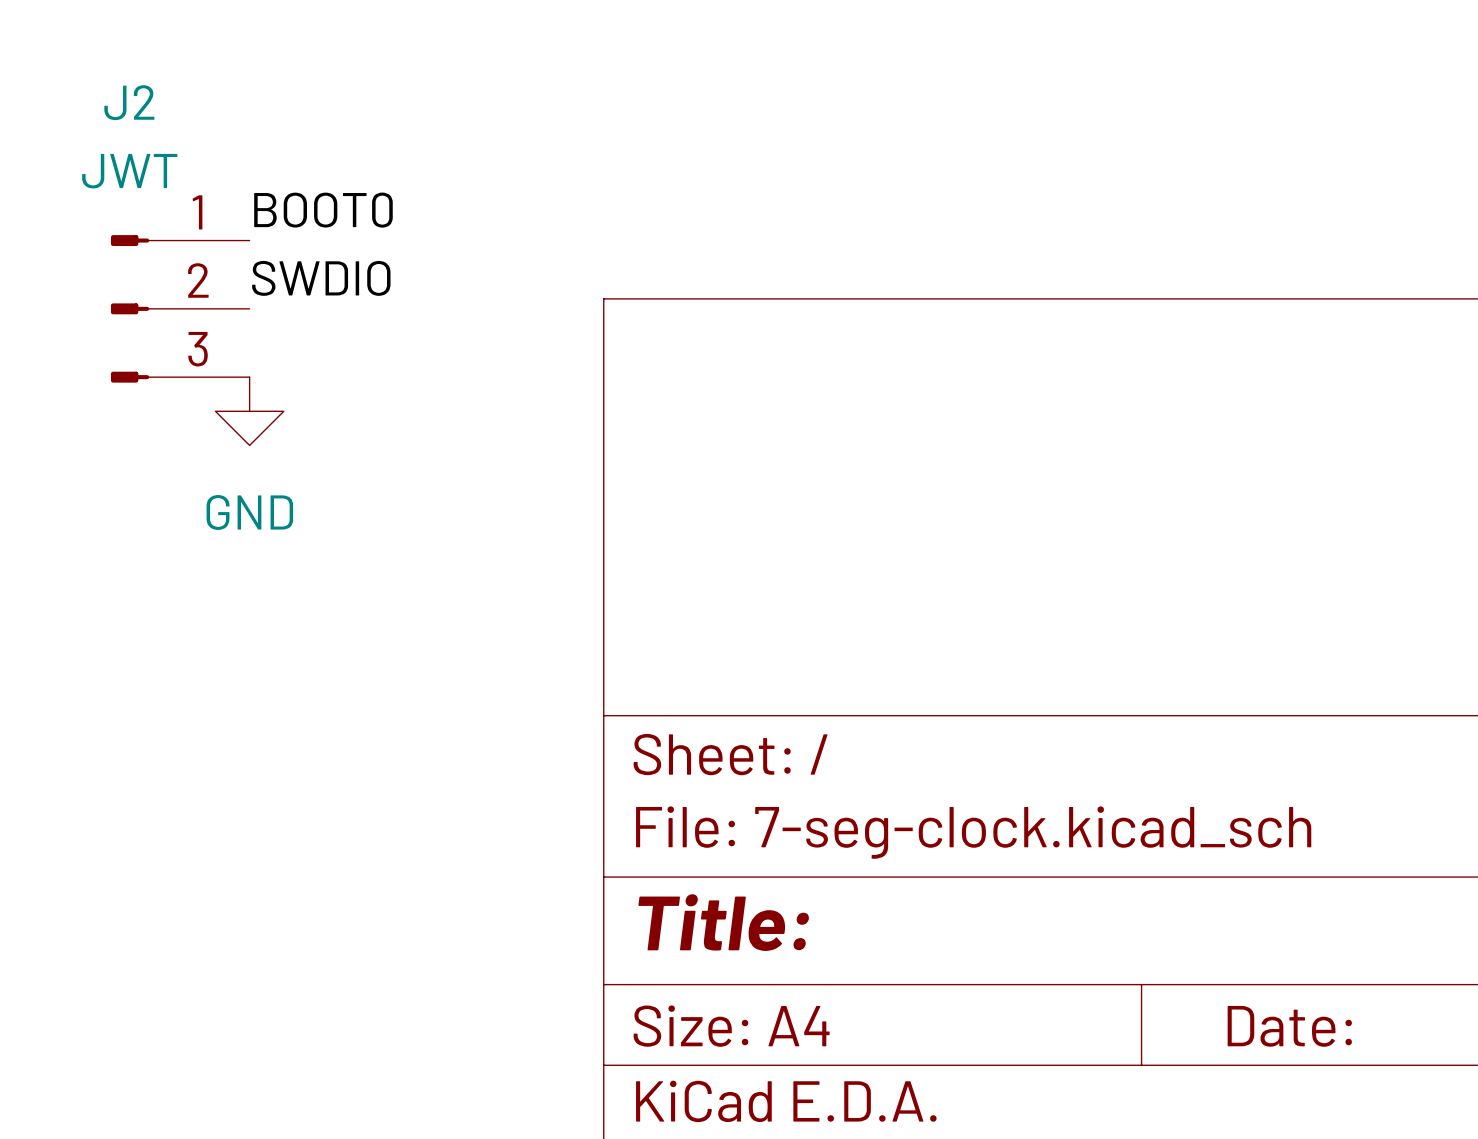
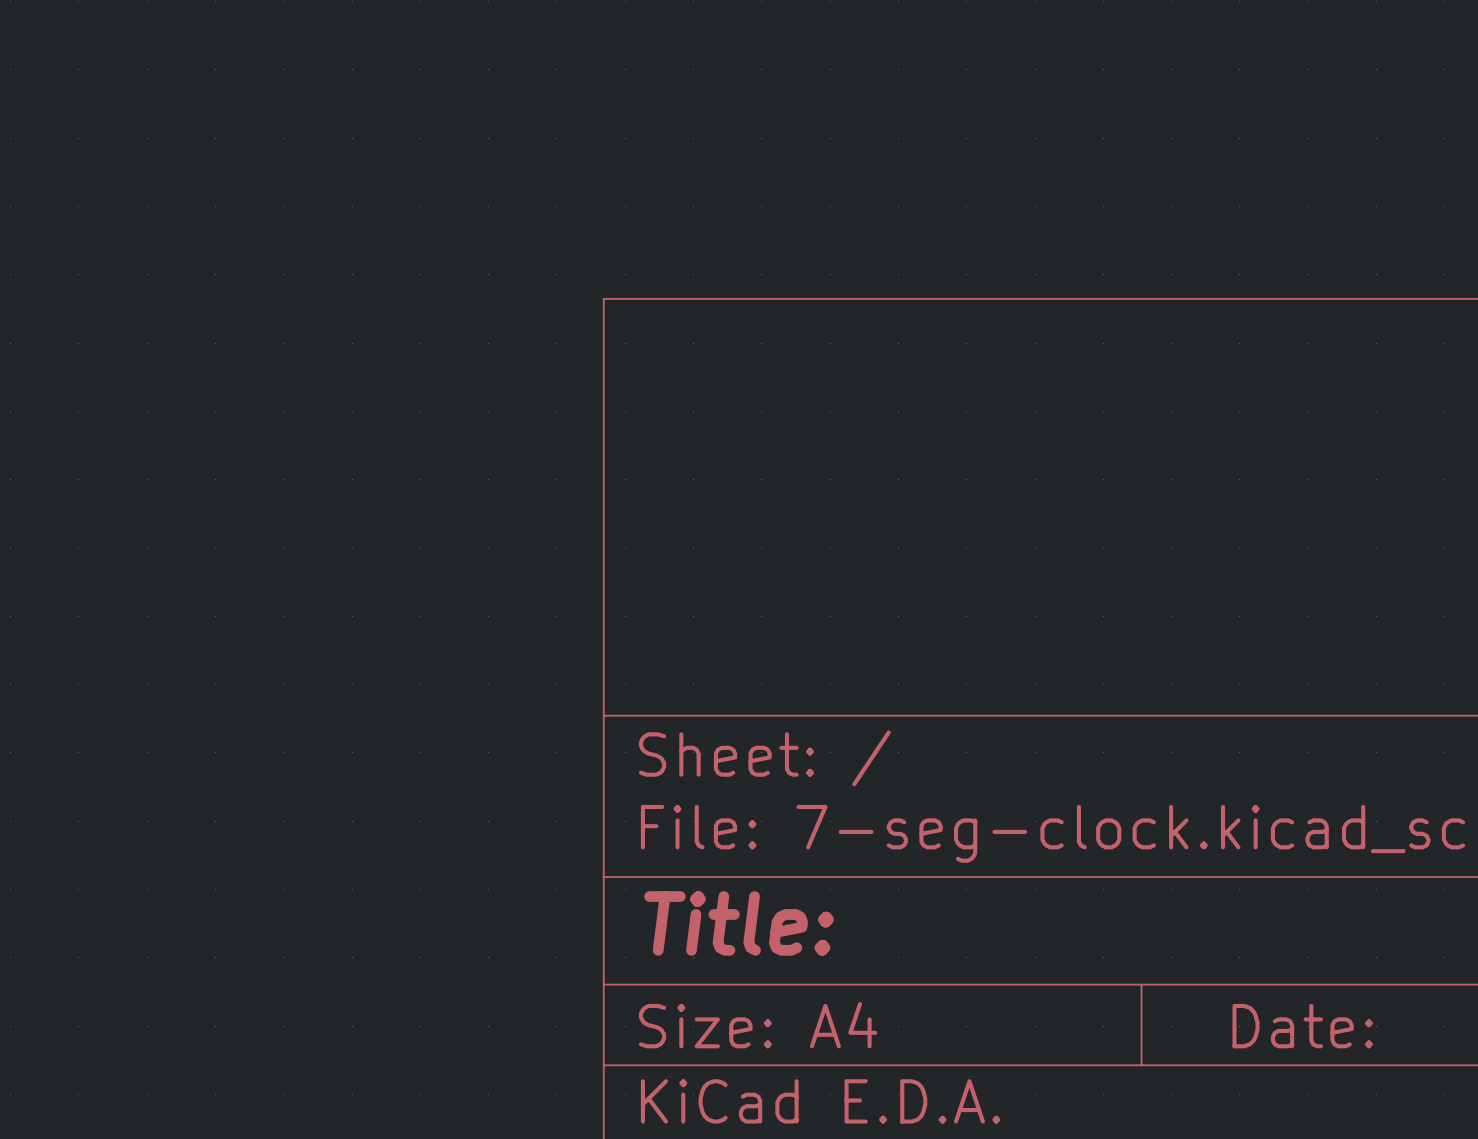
label: BOOT0 (323, 210) -> none
label: SWDIO (321, 278) -> none
J2: JWT (180, 308) -> none
power symbol: GND (249, 411) -> none

